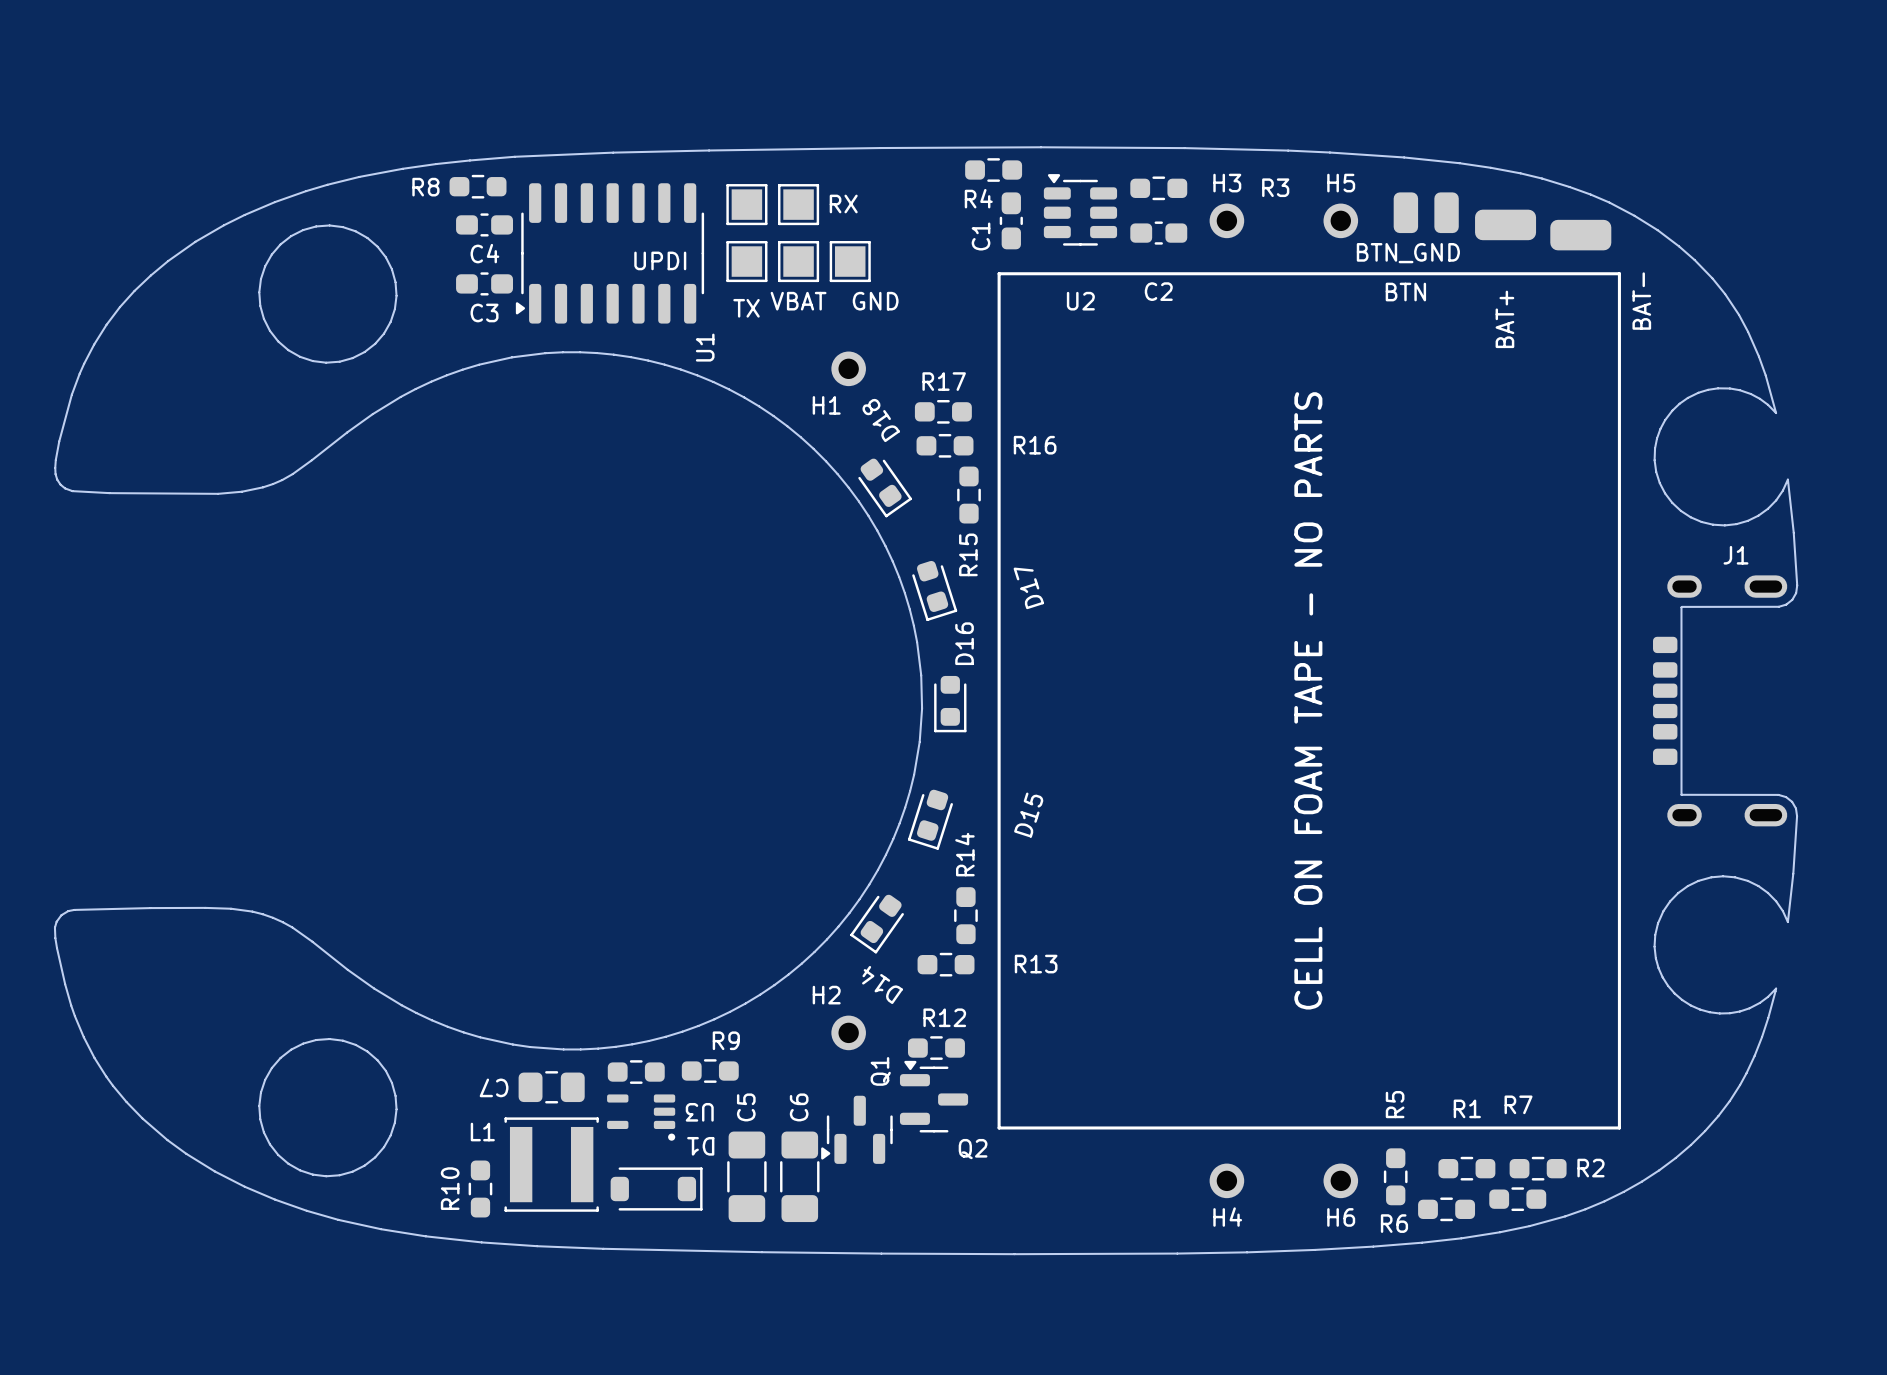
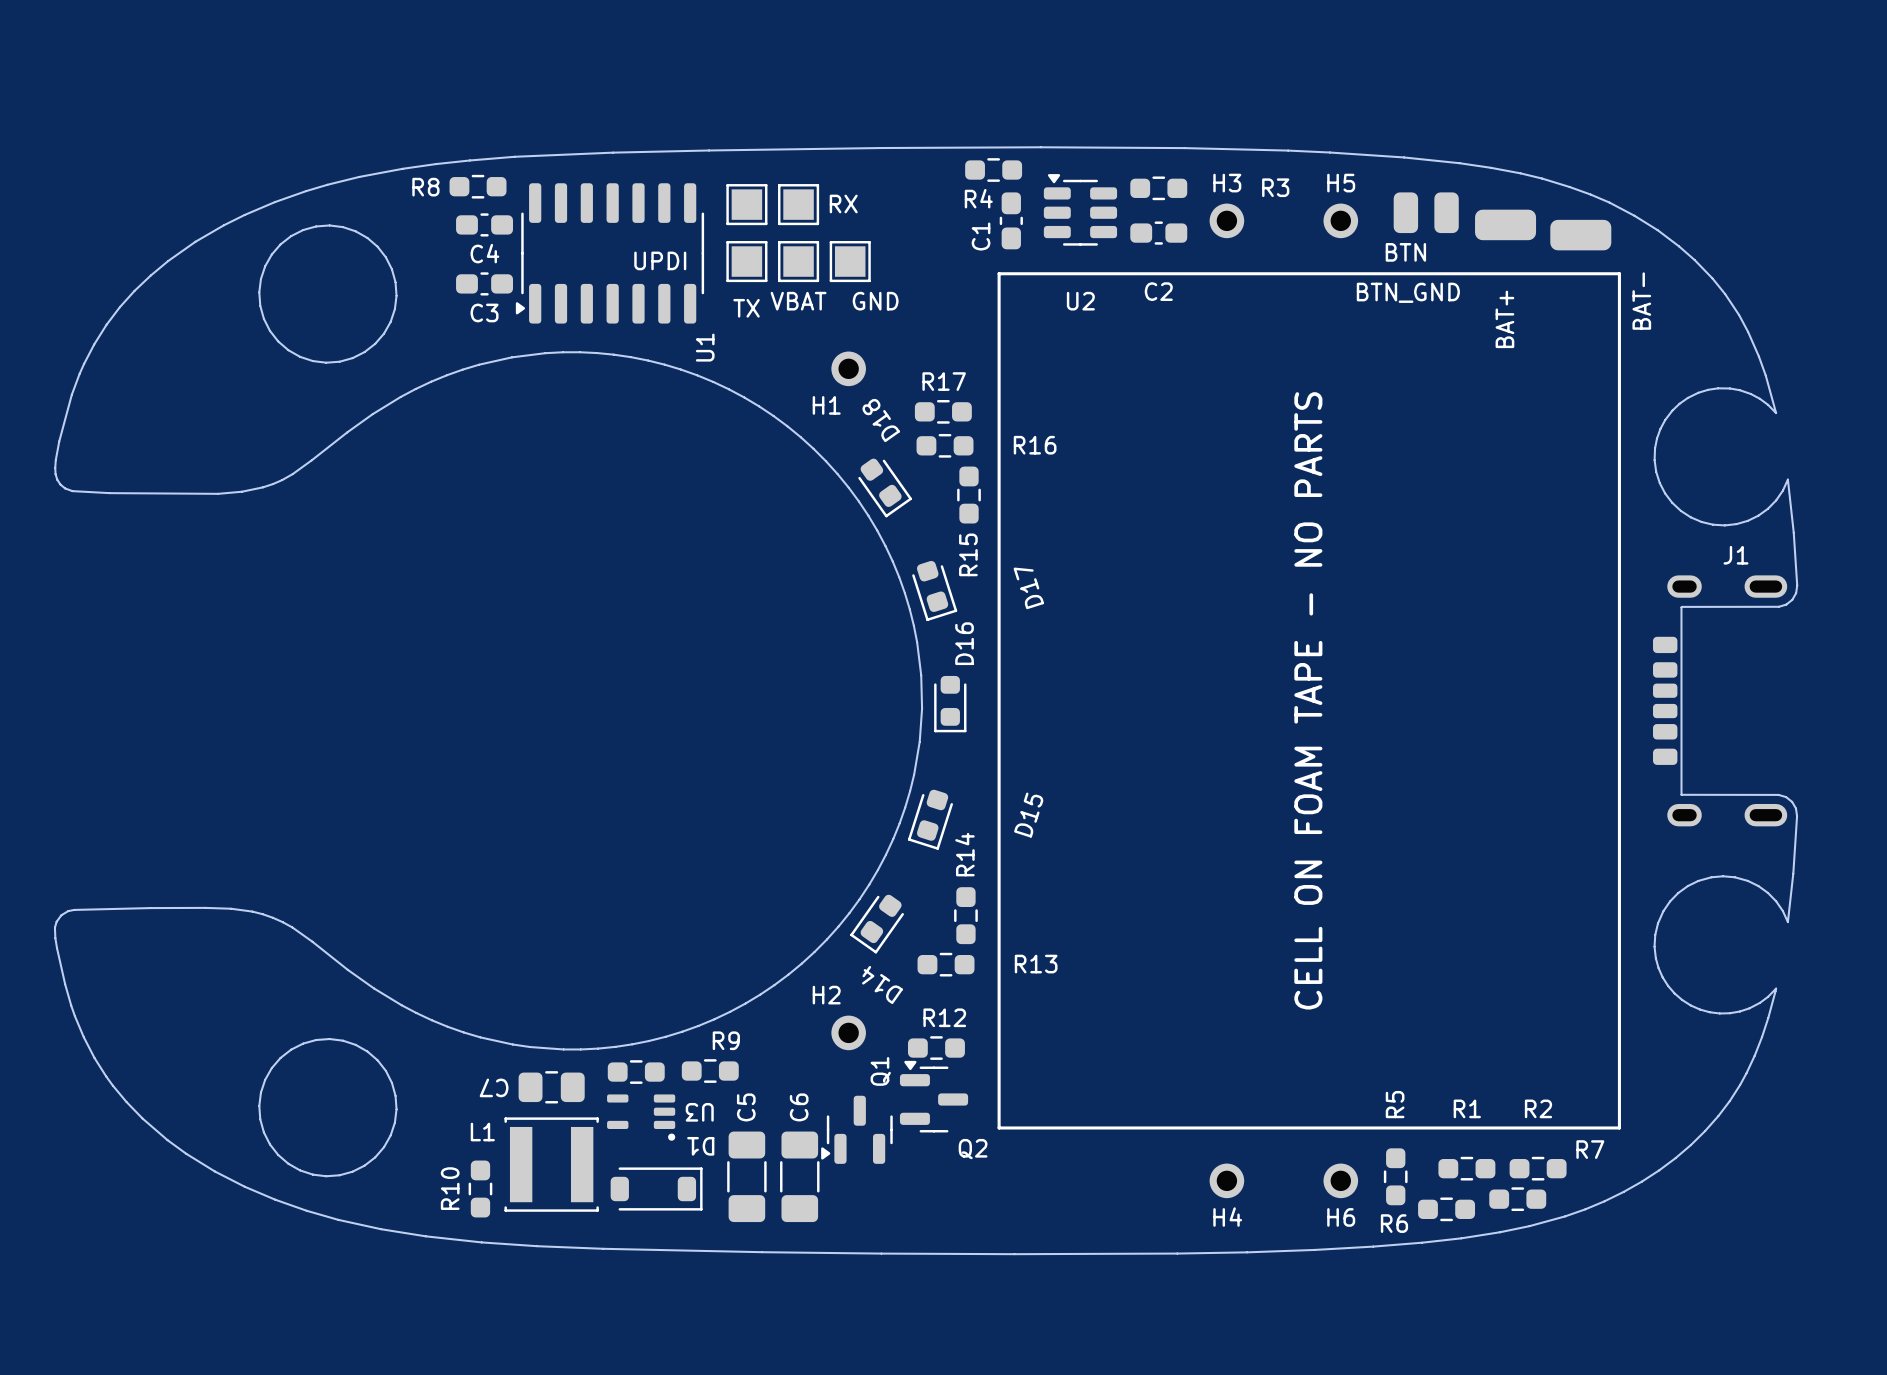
part value position: BTN_GND (1408, 253) -> BTN_GND (1408, 292)
part value position: BTN (1405, 292) -> BTN (1405, 252)
R7 name position: R7 (1518, 1104) -> R7 (1590, 1149)
R2 name position: R2 (1590, 1168) -> R2 (1538, 1108)

